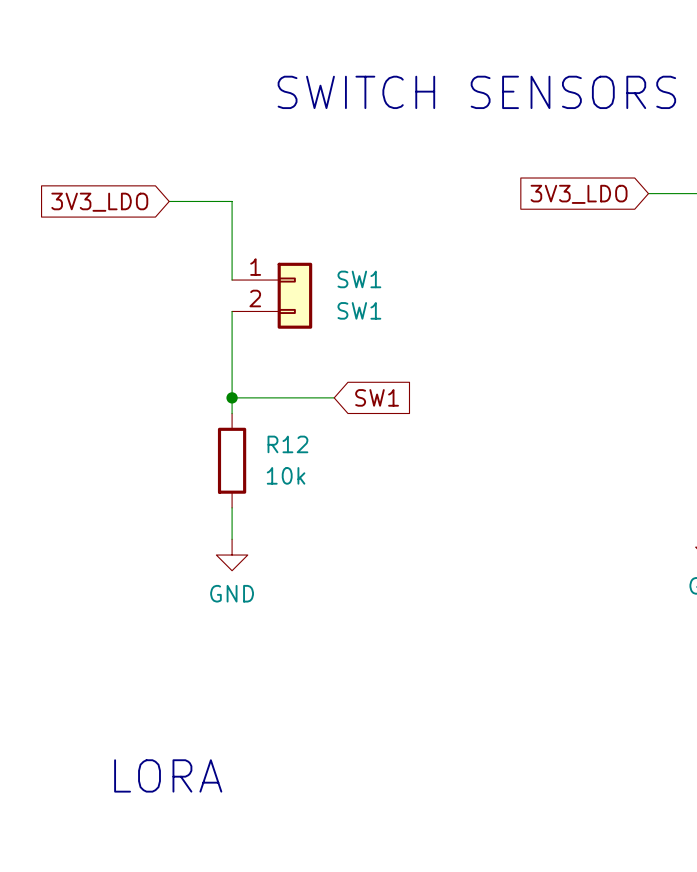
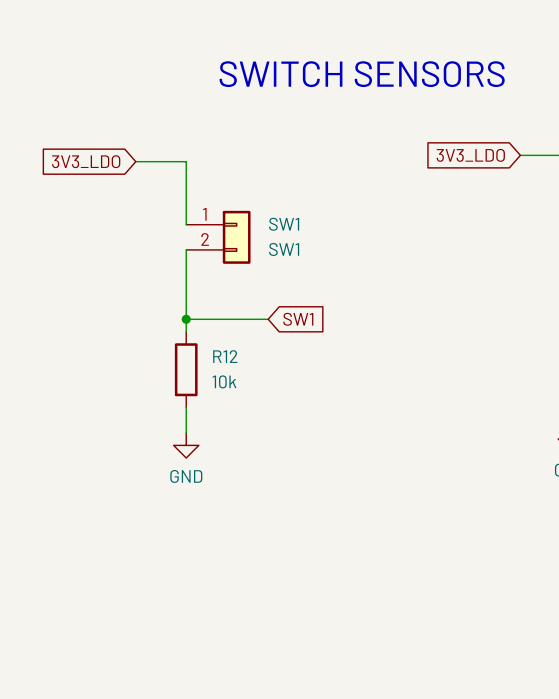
text: LORA (168, 775) -> none

